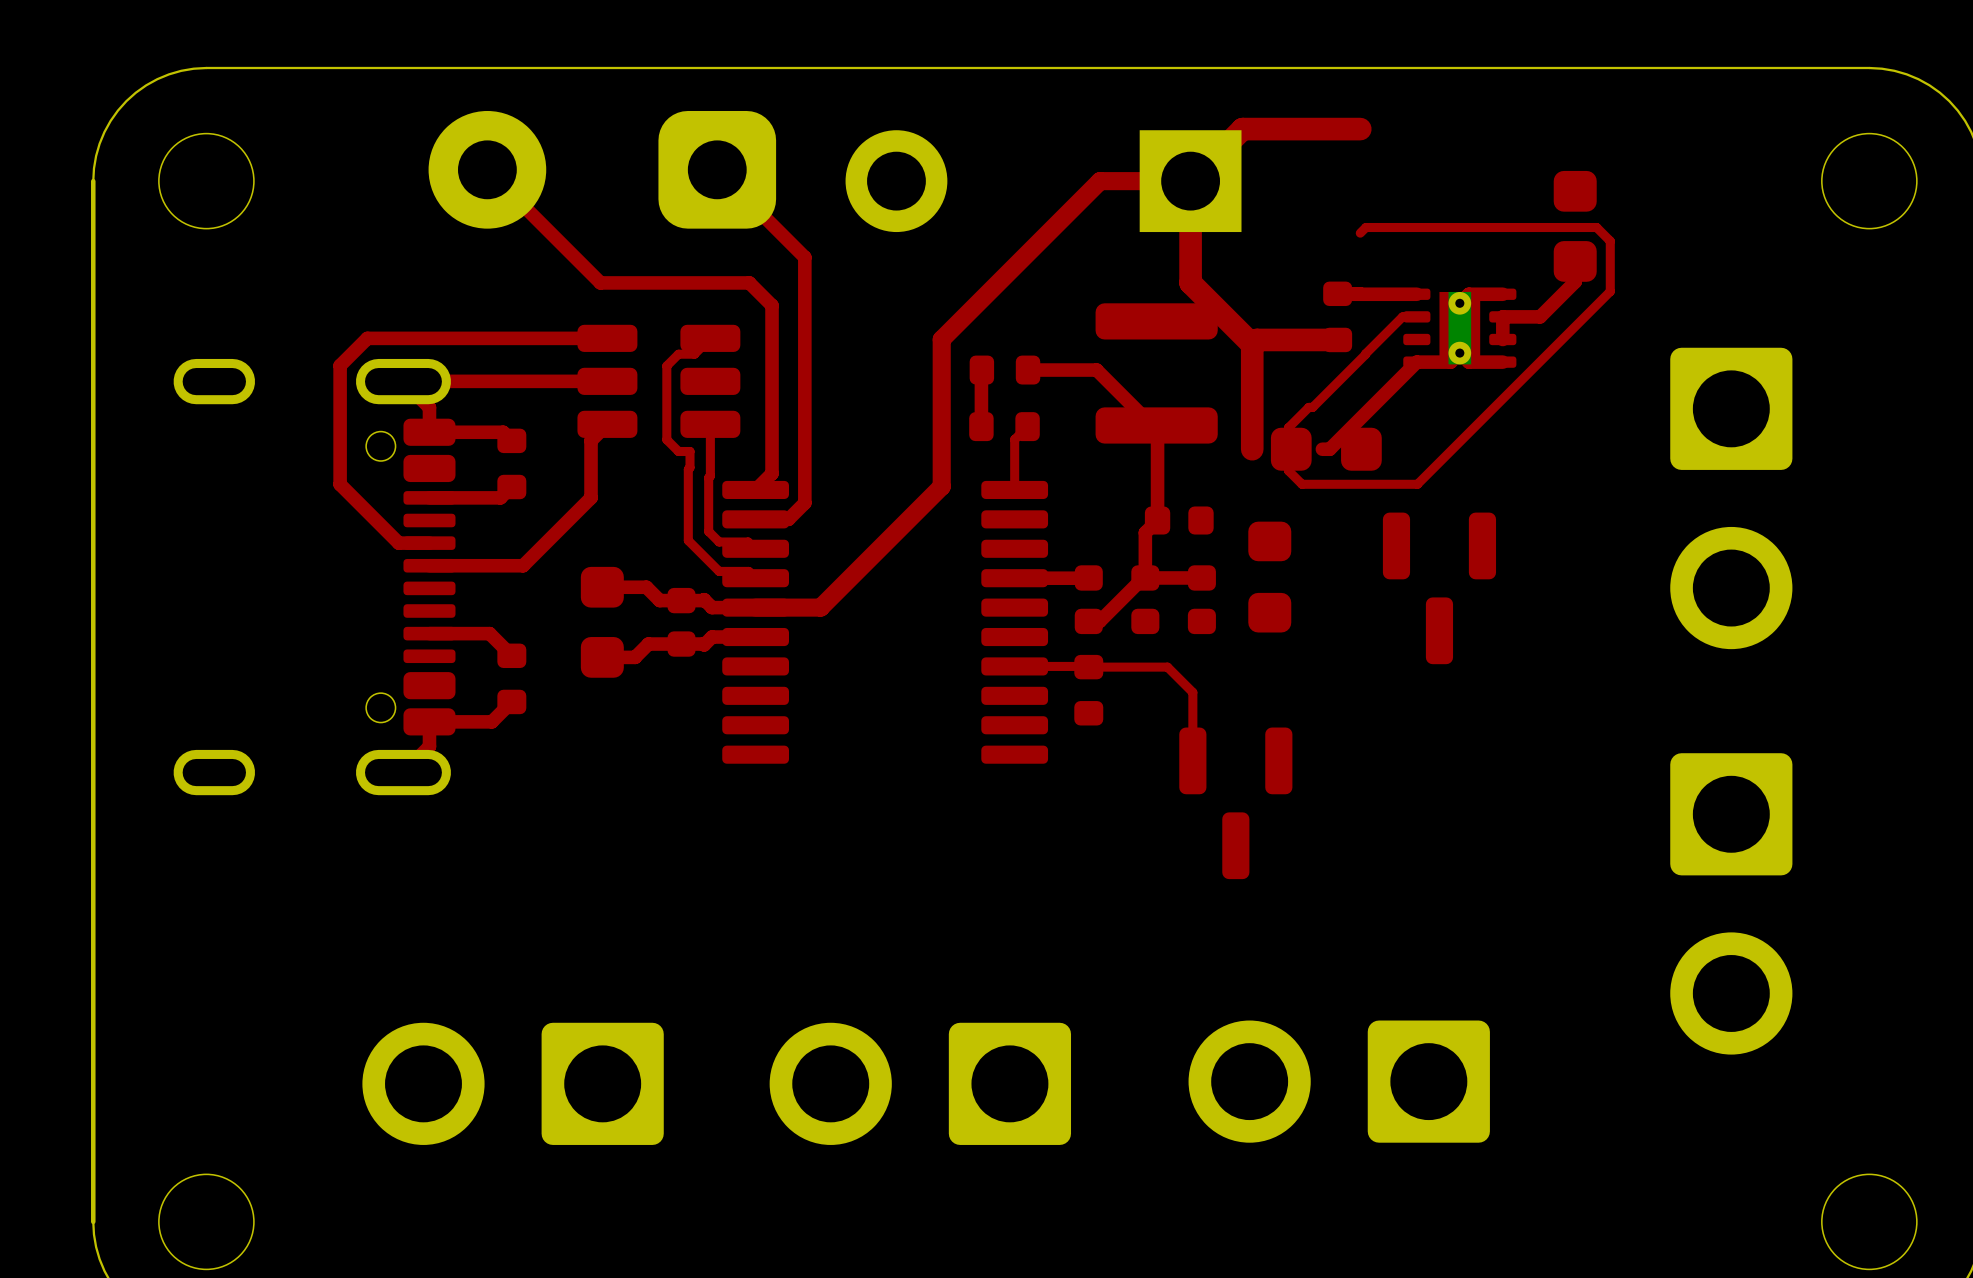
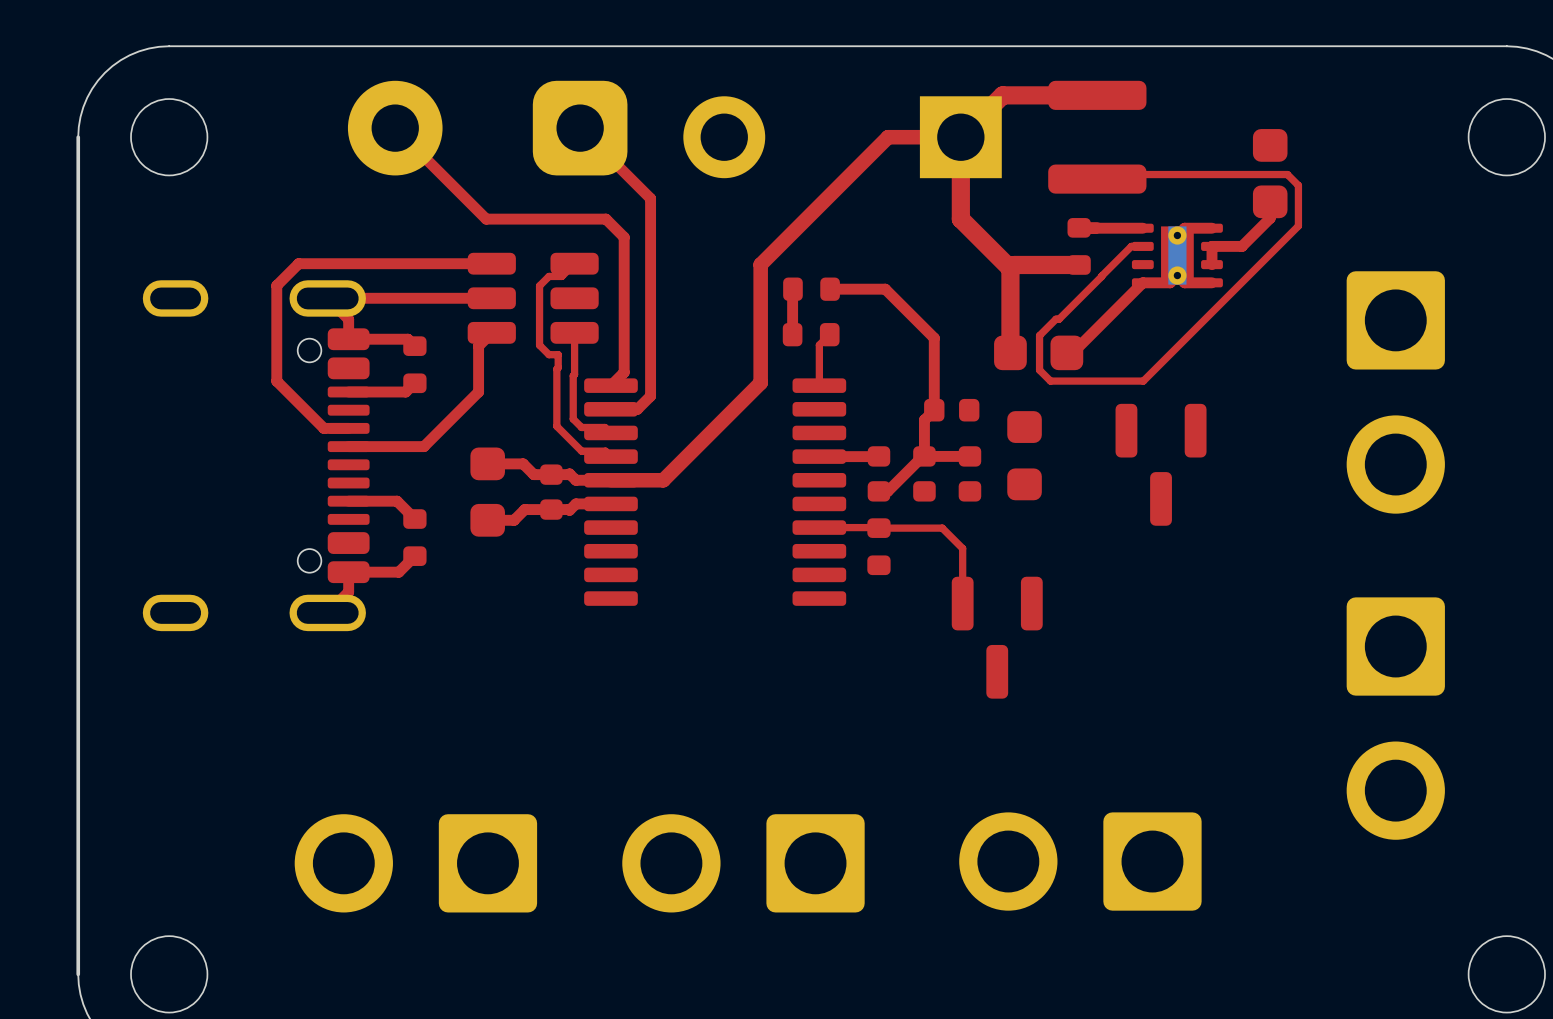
part position: (1156, 373) -> (1097, 137)
part position: (1326, 449) -> (1038, 352)

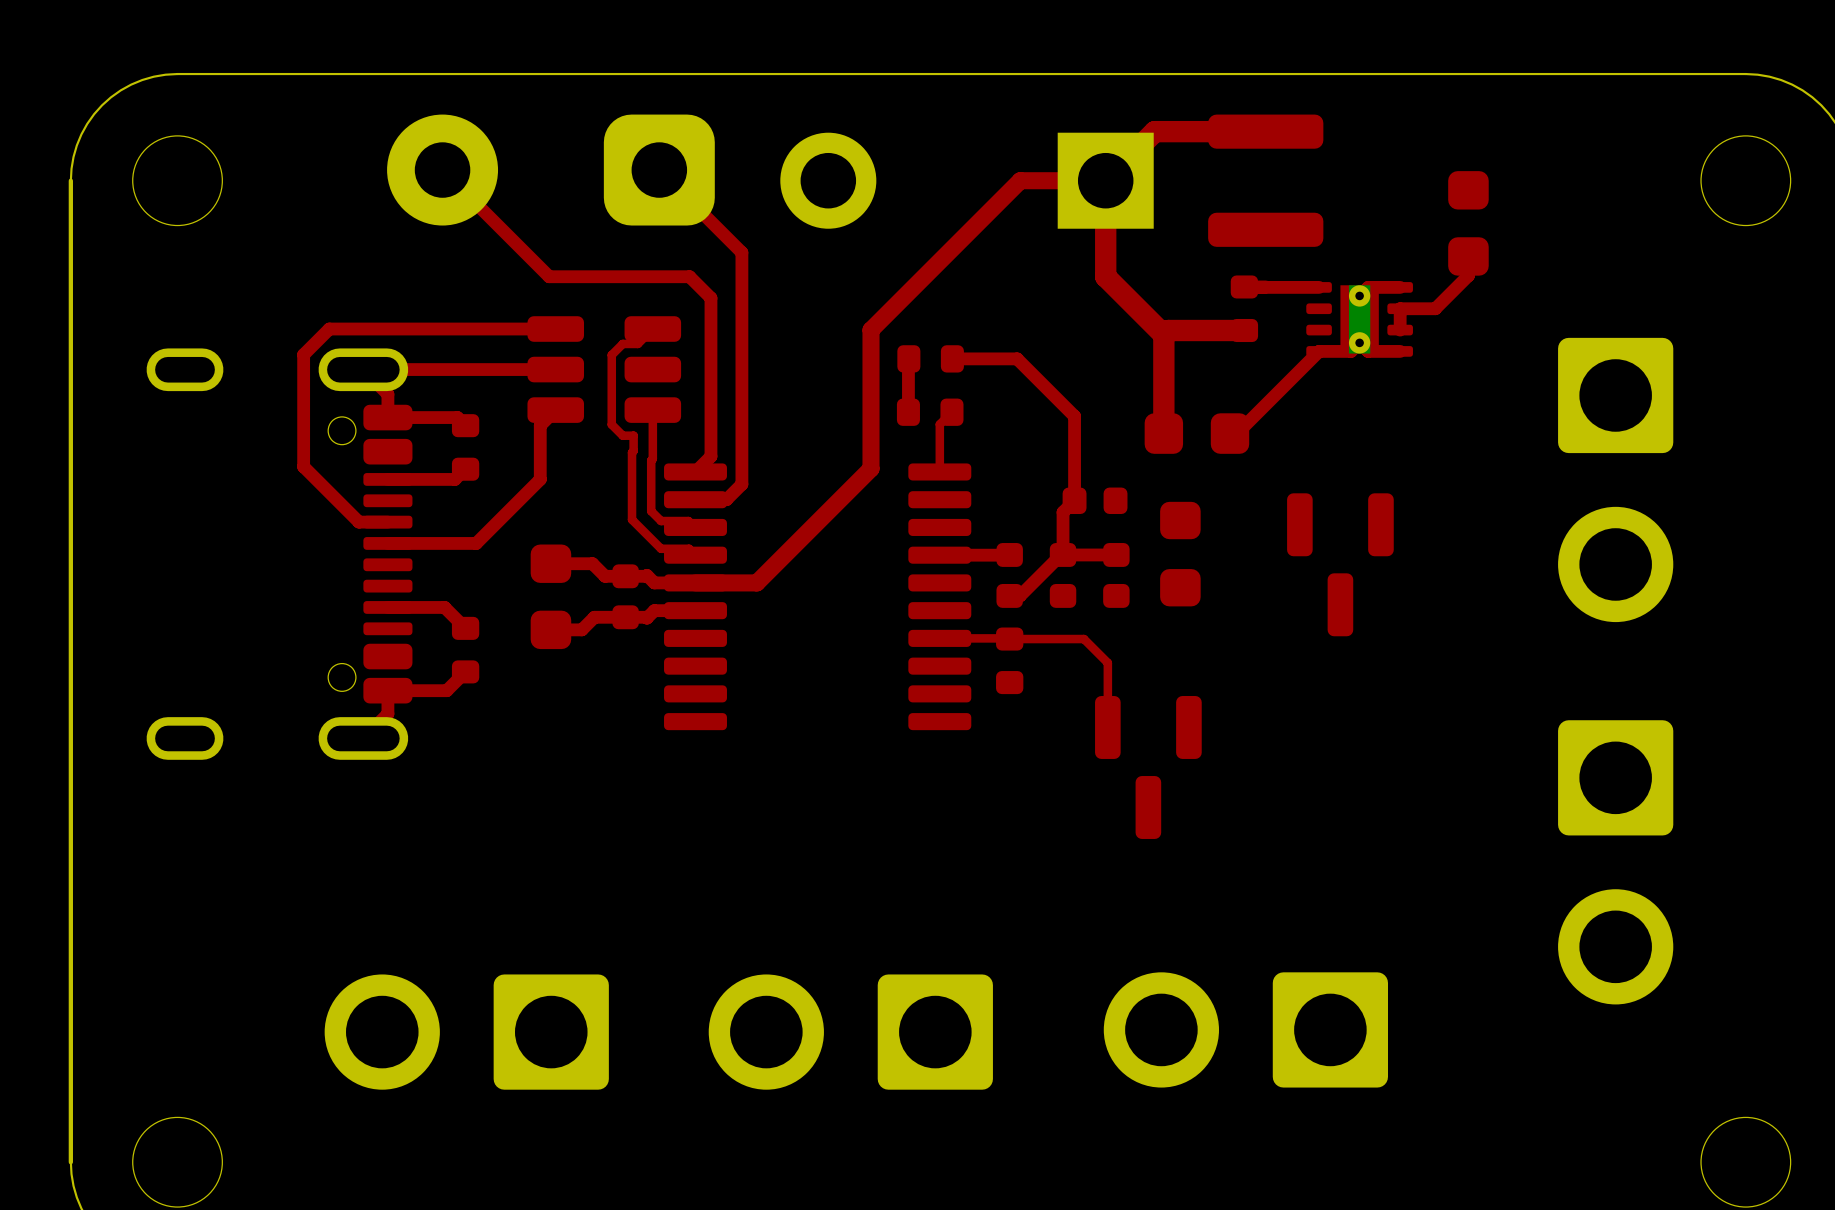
top track: (1097, 179) (1101, 174) (1287, 174) (1298, 185) (1298, 226) (1143, 381) (1050, 381) (1039, 370) (1039, 335) (1055, 319) (1059, 319) (1101, 276) -> none
top track: (1142, 246) (1131, 246) (1101, 276) -> none

